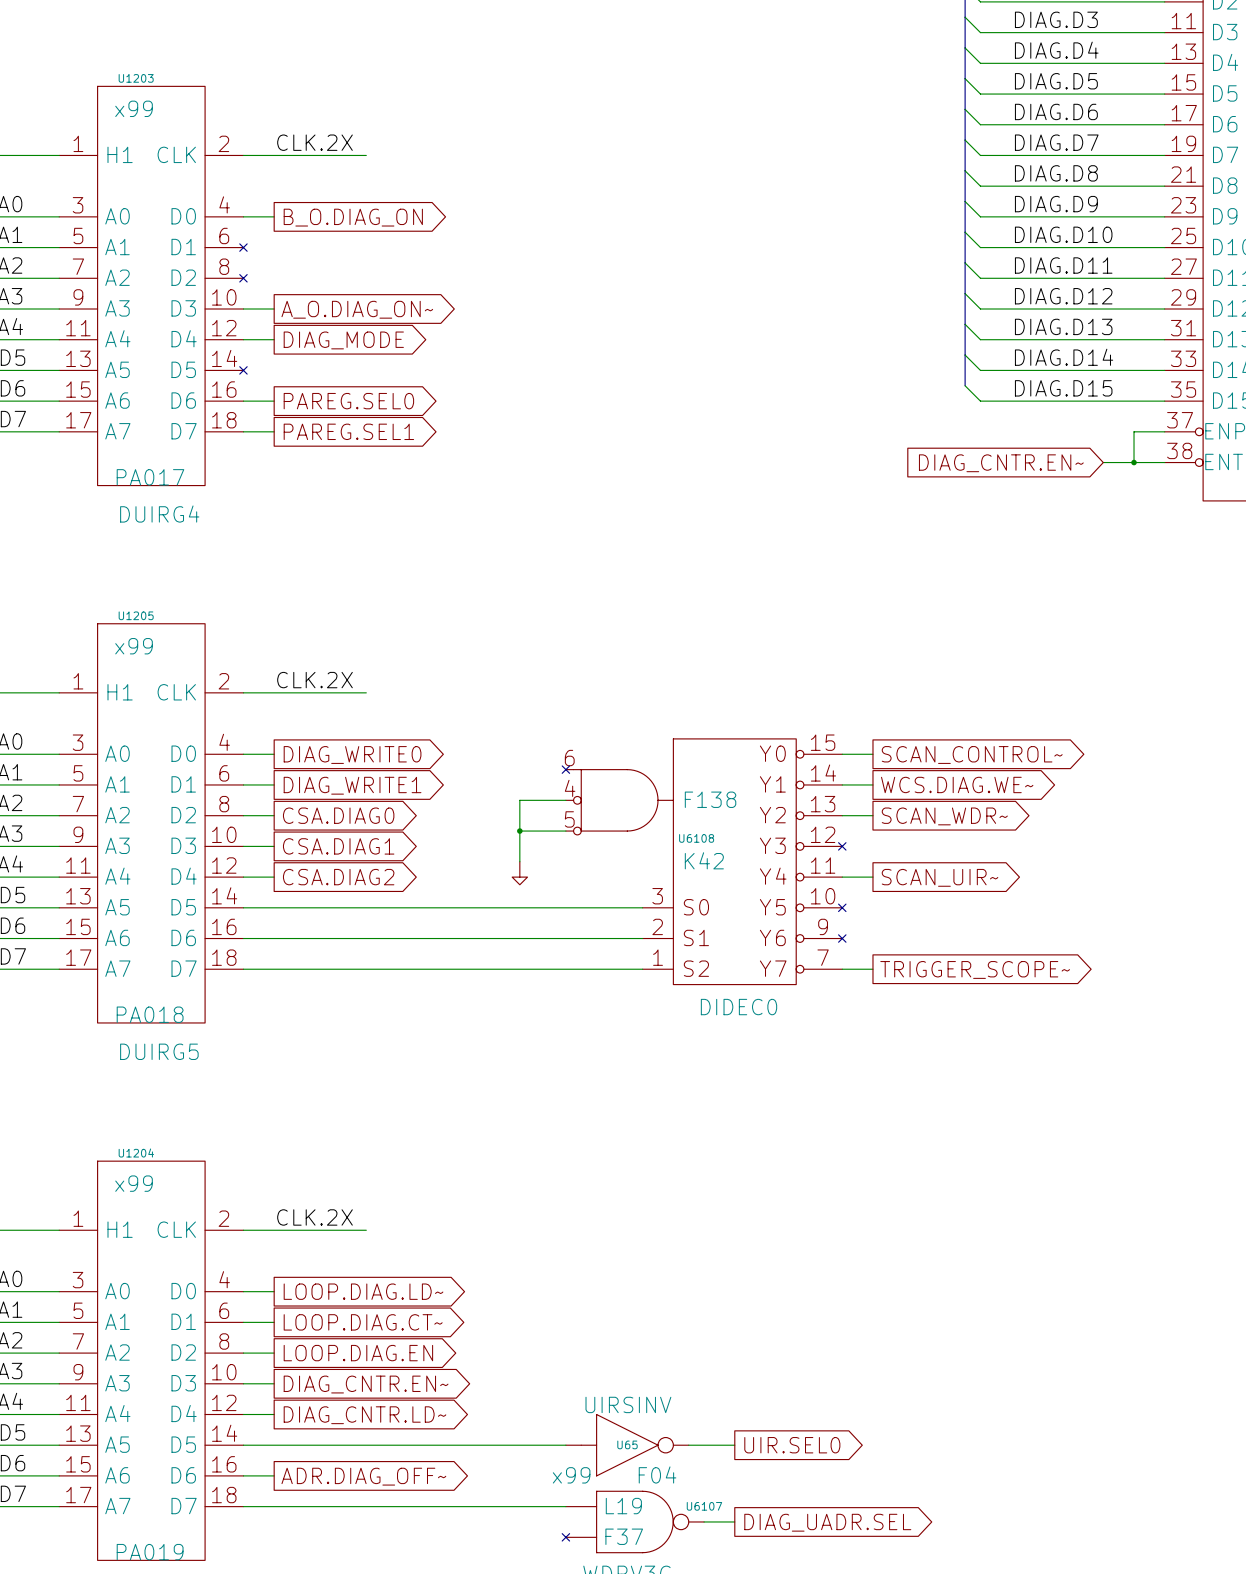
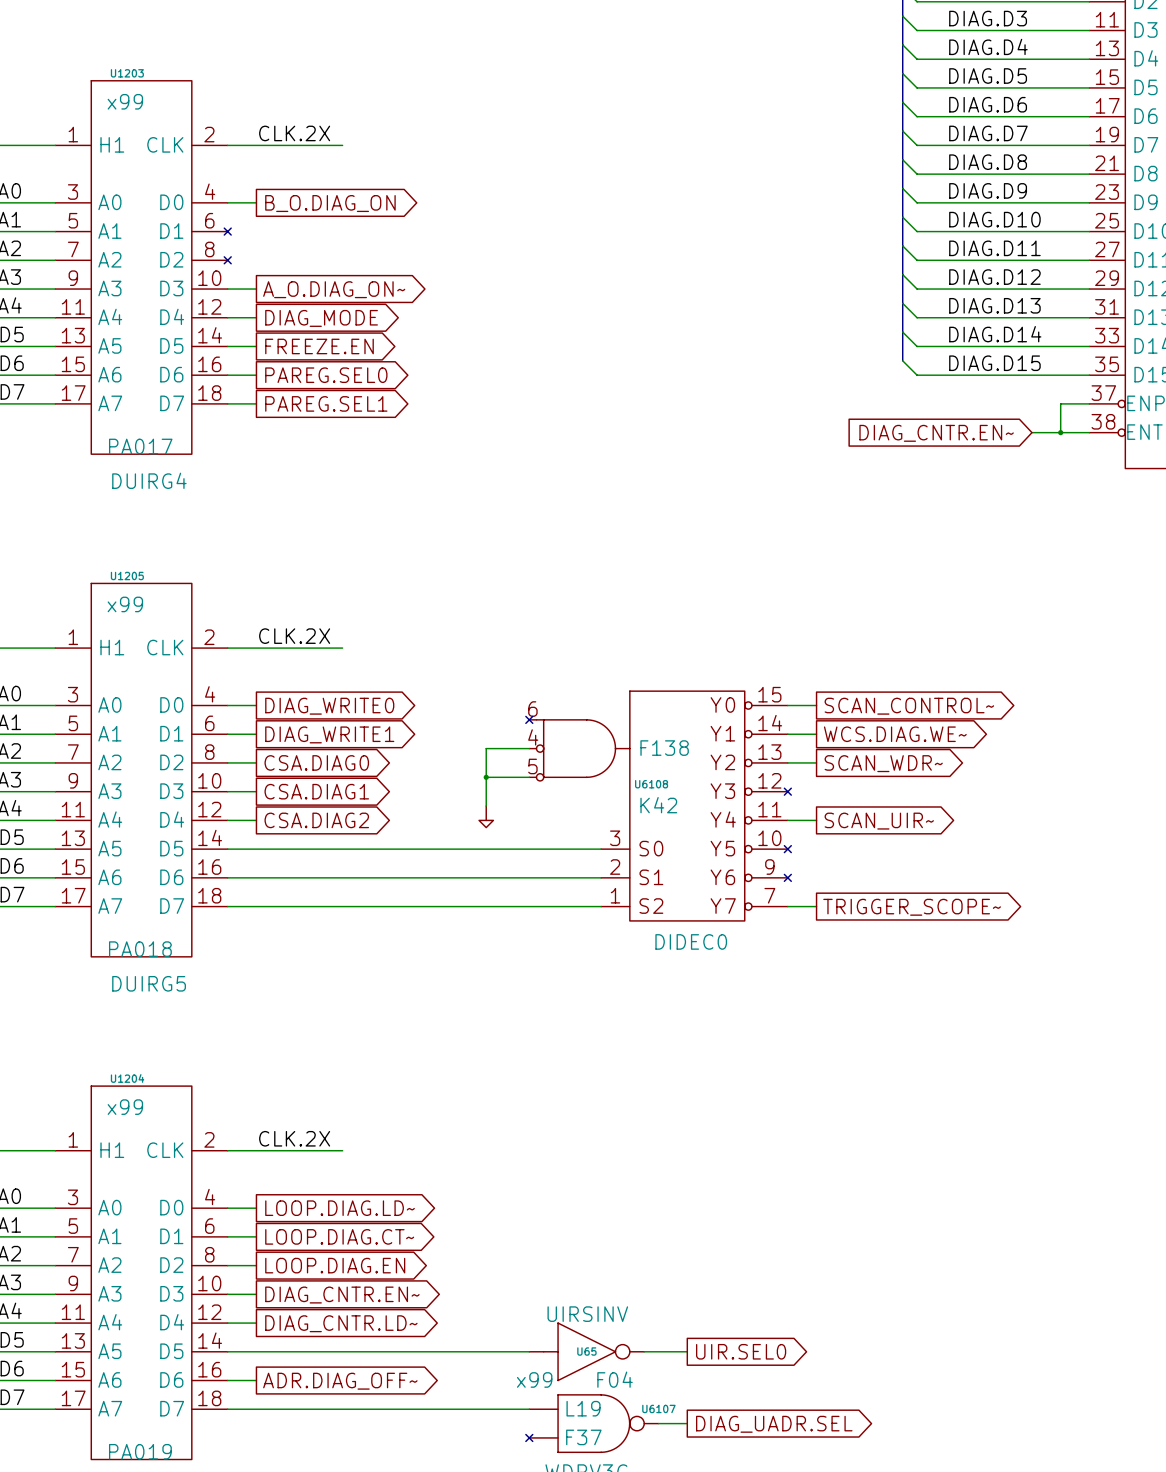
wire: none -> (227, 346) (256, 346)
no-connect mark: (243, 370) -> none
global label: none -> FREEZE.EN (319, 346)

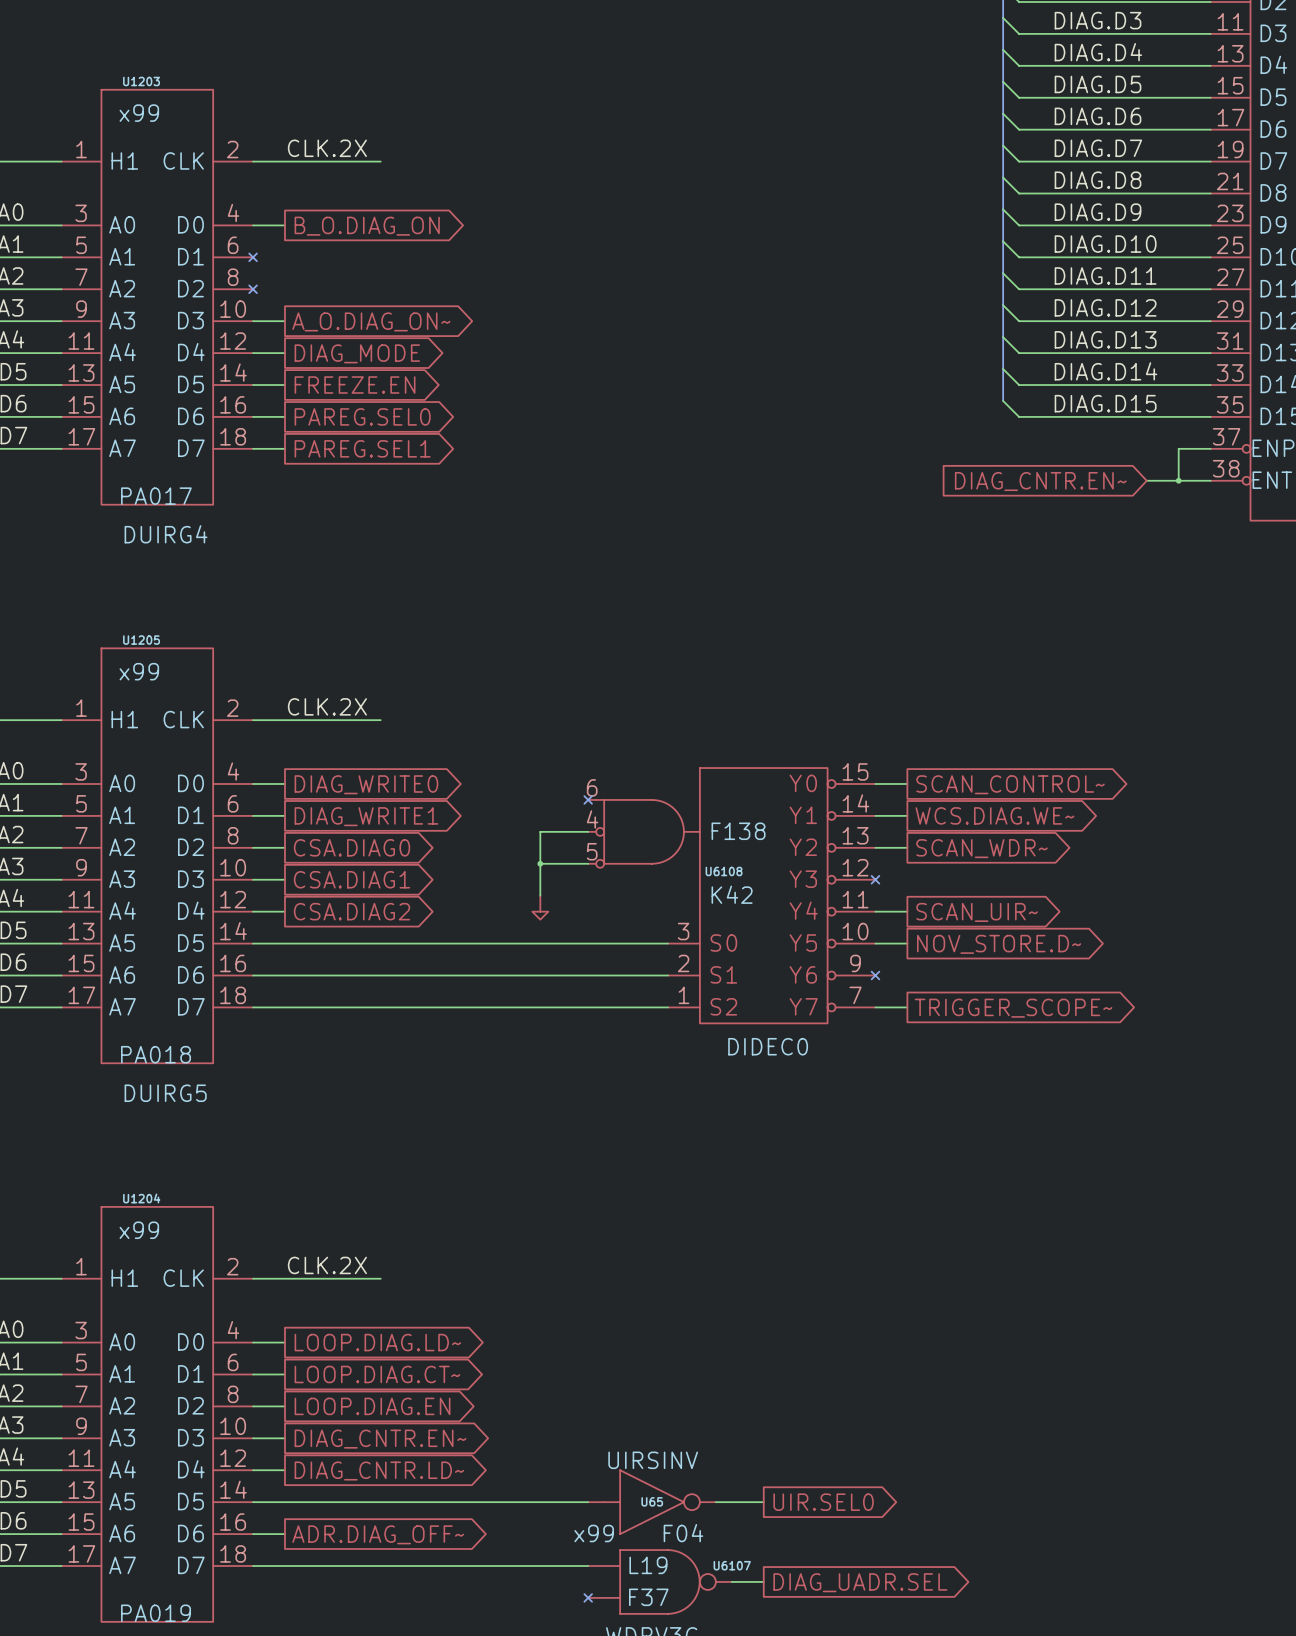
wire: none -> (875, 943) (907, 943)
no-connect mark: (787, 849) -> none
global label: none -> NOV_STORE.D~ (999, 944)

